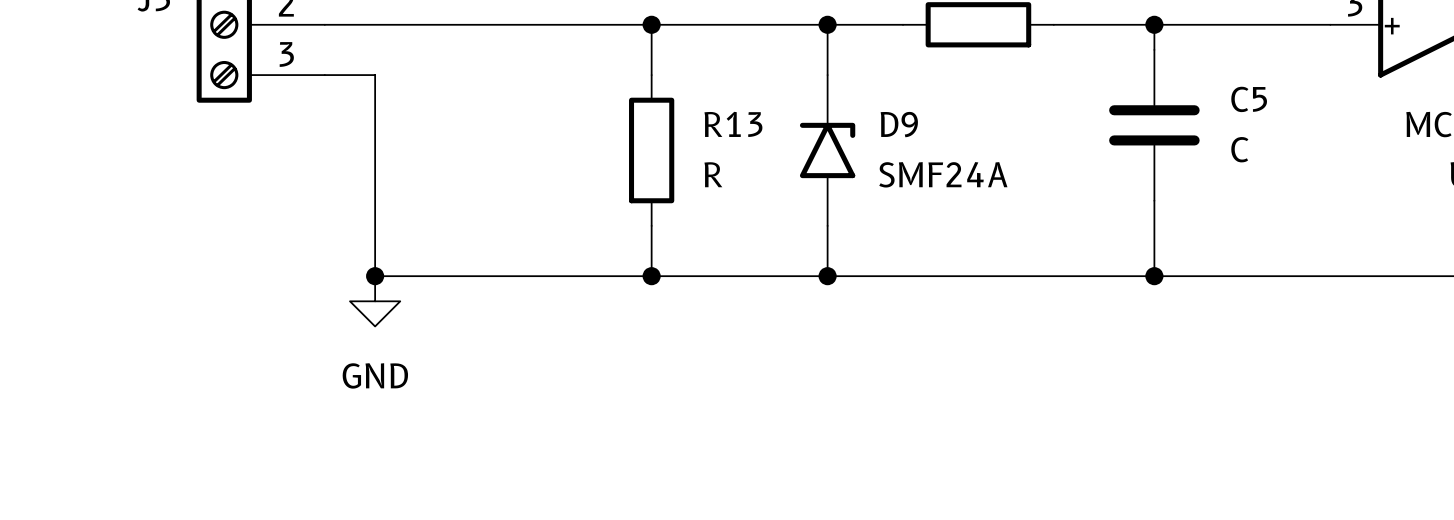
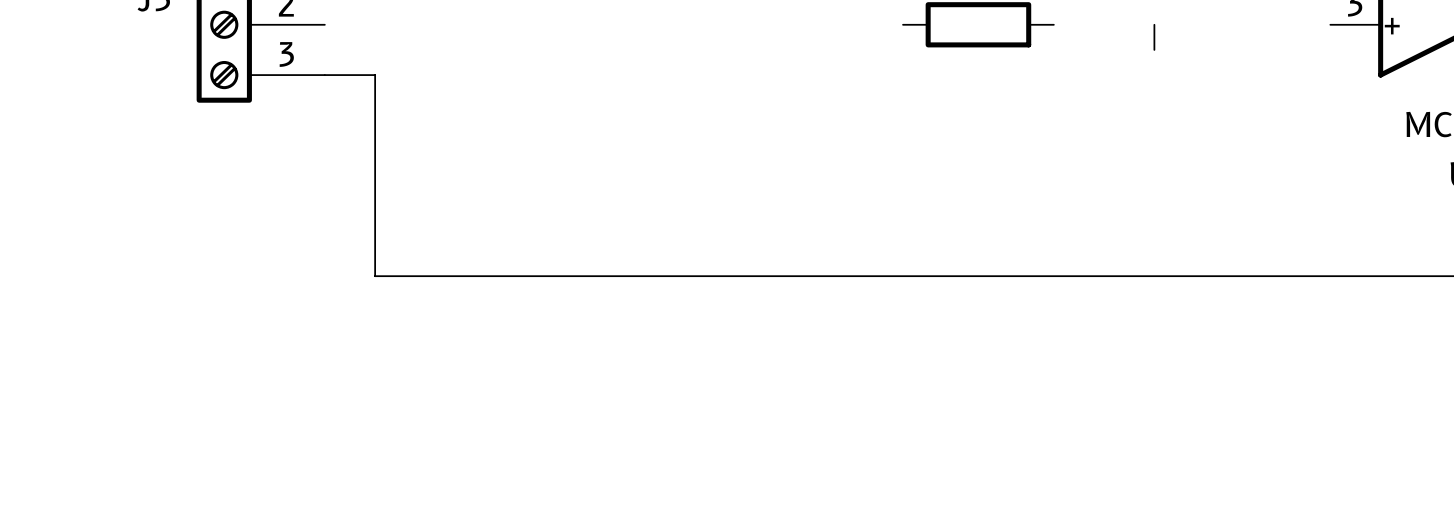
wire: (324, 24) (903, 24) -> none
wire: (651, 24) (651, 75) -> none
junction: (651, 24) -> none
wire: (827, 24) (827, 75) -> none
junction: (827, 24) -> none
wire: (1053, 24) (1330, 24) -> none
junction: (1154, 24) -> none
C5: C (1154, 125) -> none
R13: R (651, 150) -> none
D9: SMF24A (827, 150) -> none
wire: (1154, 200) (1154, 276) -> none
wire: (651, 225) (651, 276) -> none
wire: (827, 225) (827, 276) -> none
junction: (375, 276) -> none
junction: (651, 276) -> none
junction: (827, 276) -> none
junction: (1154, 276) -> none
power symbol: GND (375, 301) -> none

